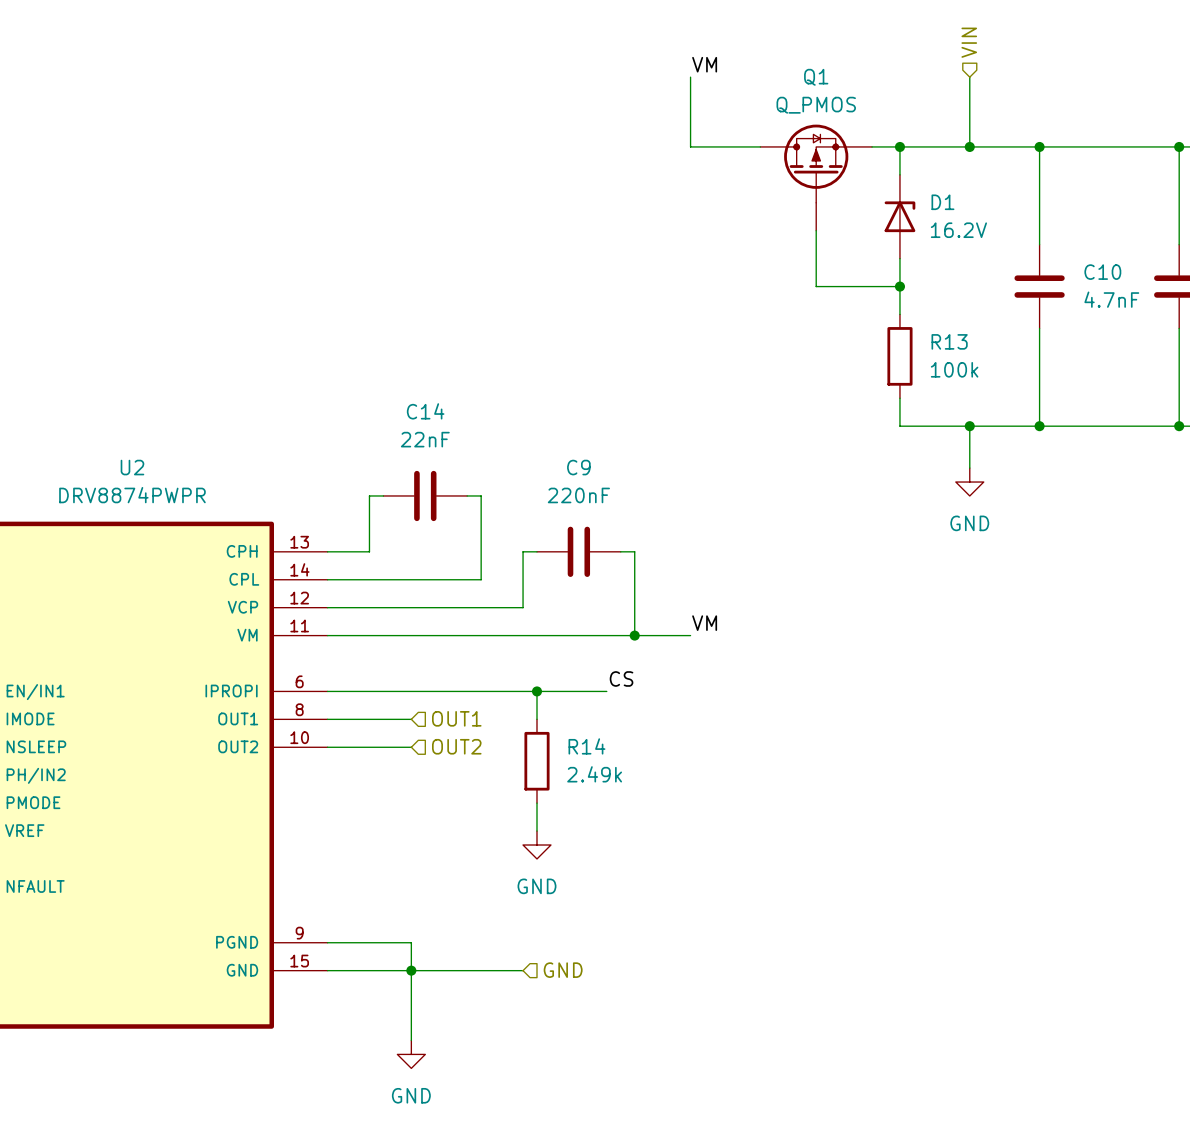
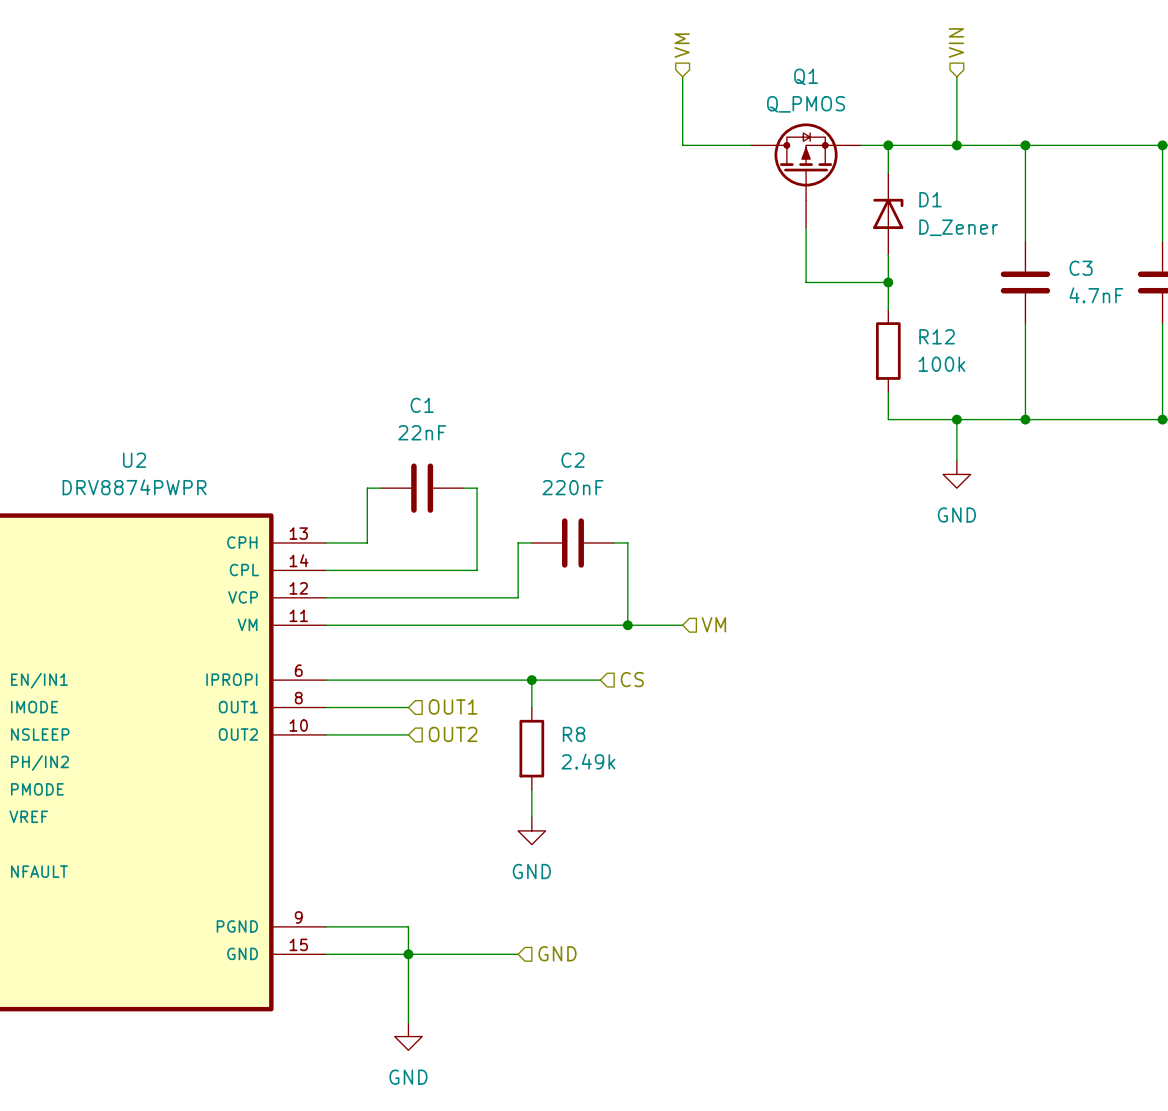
hierarchical label: none -> VM (682, 45)
label: VM (704, 64) -> none
D1 value: 16.2V (958, 230) -> D_Zener (958, 227)
C10 name: C10 (1102, 272) -> C3 (1081, 268)
R13 name: R13 (949, 341) -> R12 (937, 336)
C14 name: C14 (425, 411) -> C1 (422, 405)
C9 name: C9 (578, 467) -> C2 (572, 460)
label: VM (704, 623) -> none
hierarchical label: none -> VM (713, 624)
label: CS (621, 678) -> none
hierarchical label: none -> CS (632, 679)
R14 name: R14 (586, 746) -> R8 (574, 734)

